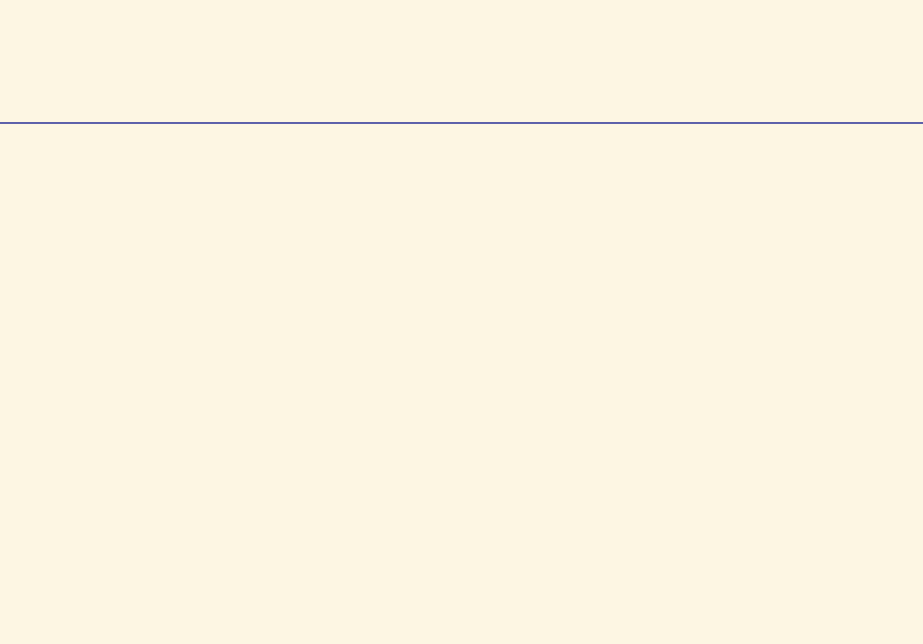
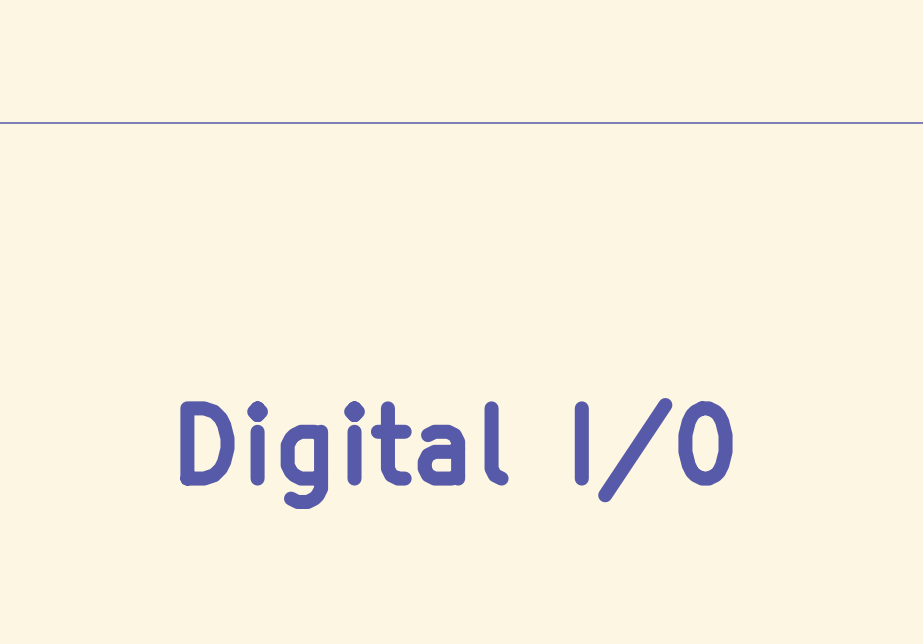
text: none -> Digital I/0 (456, 453)

